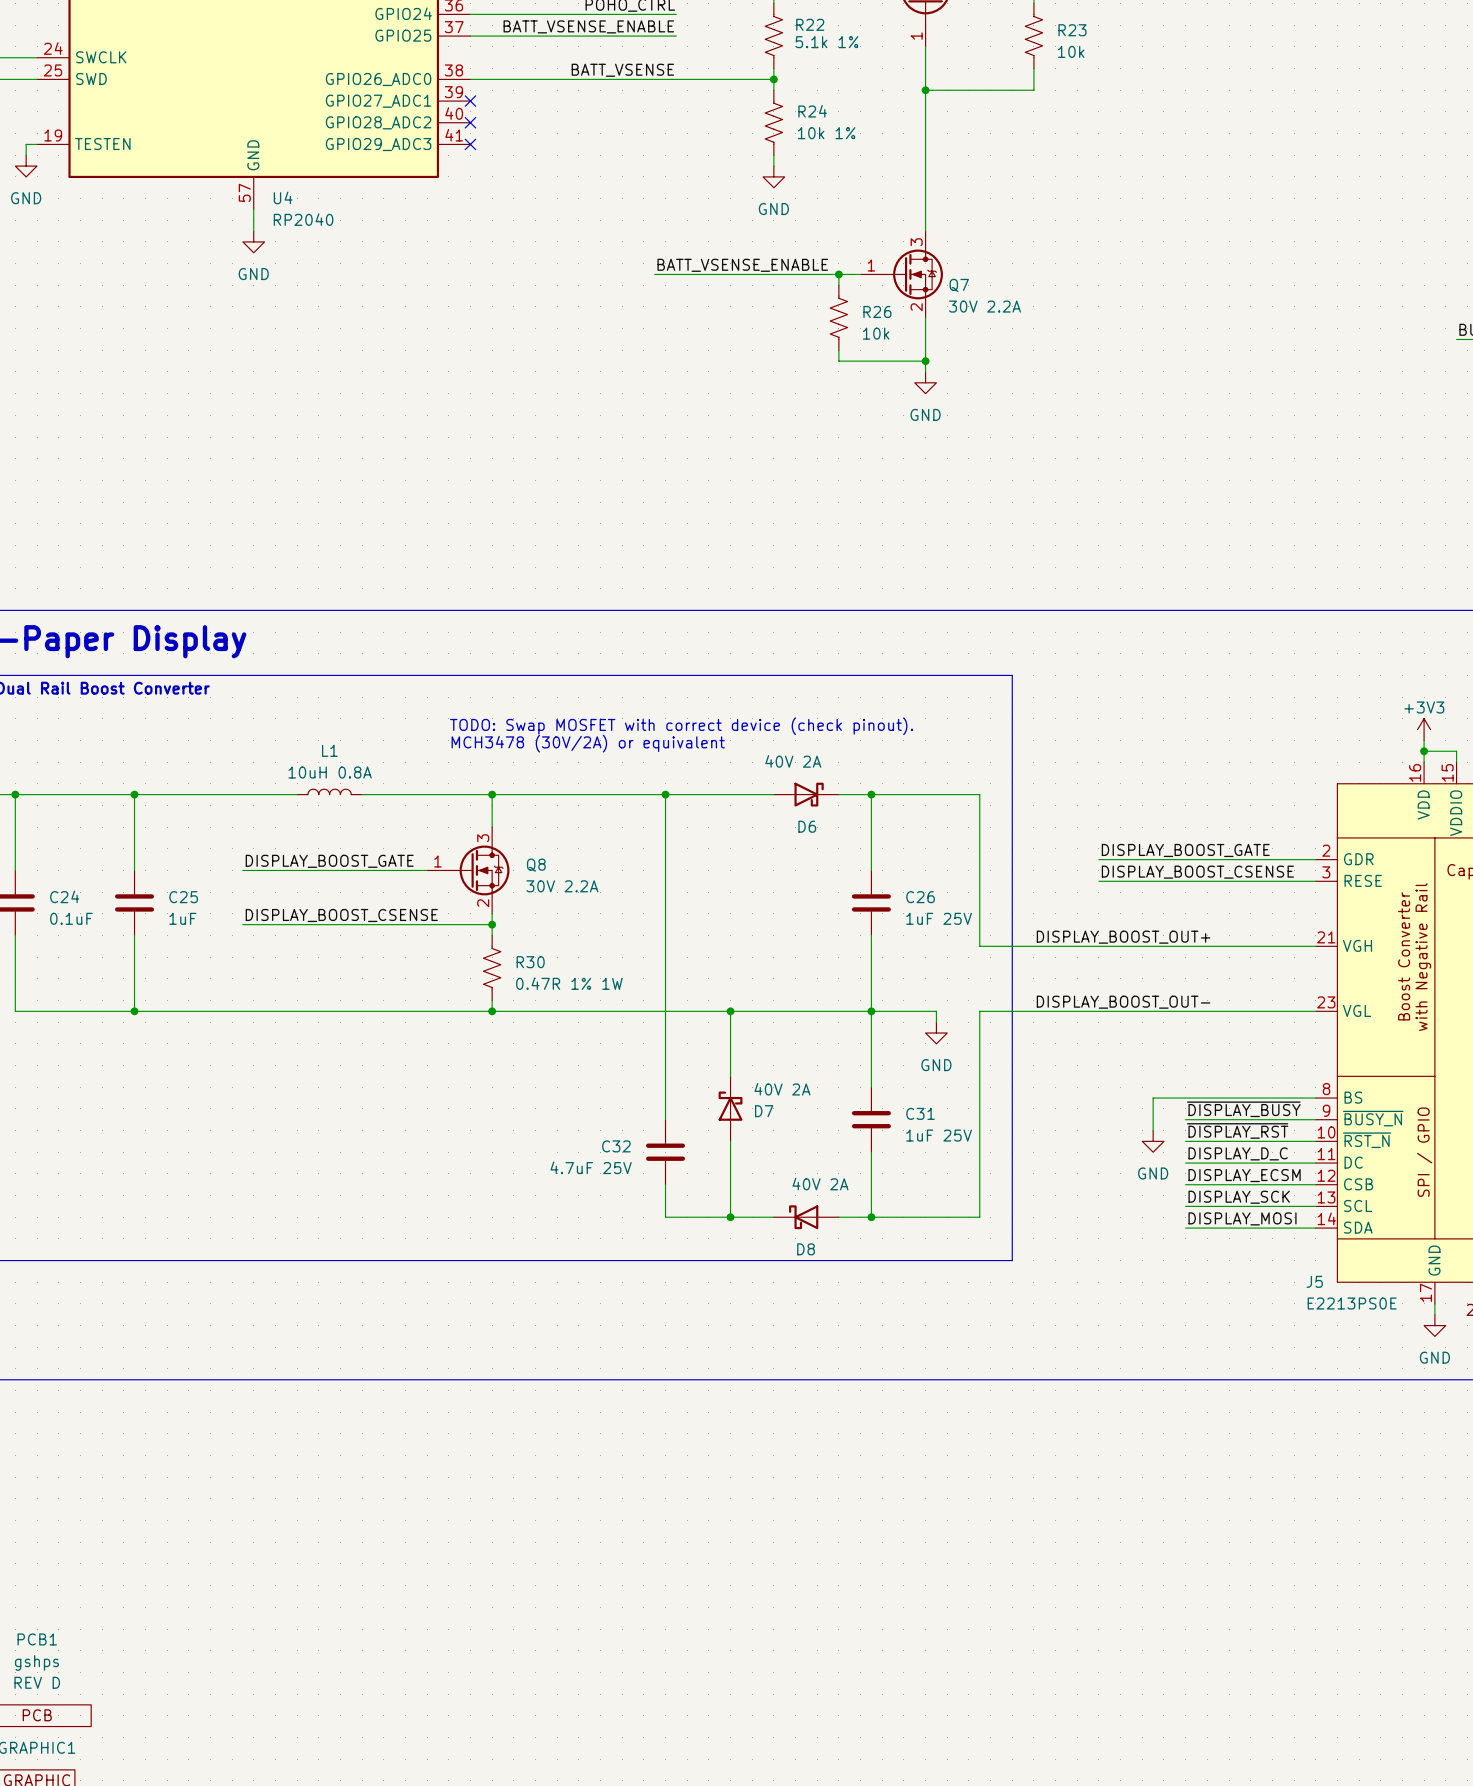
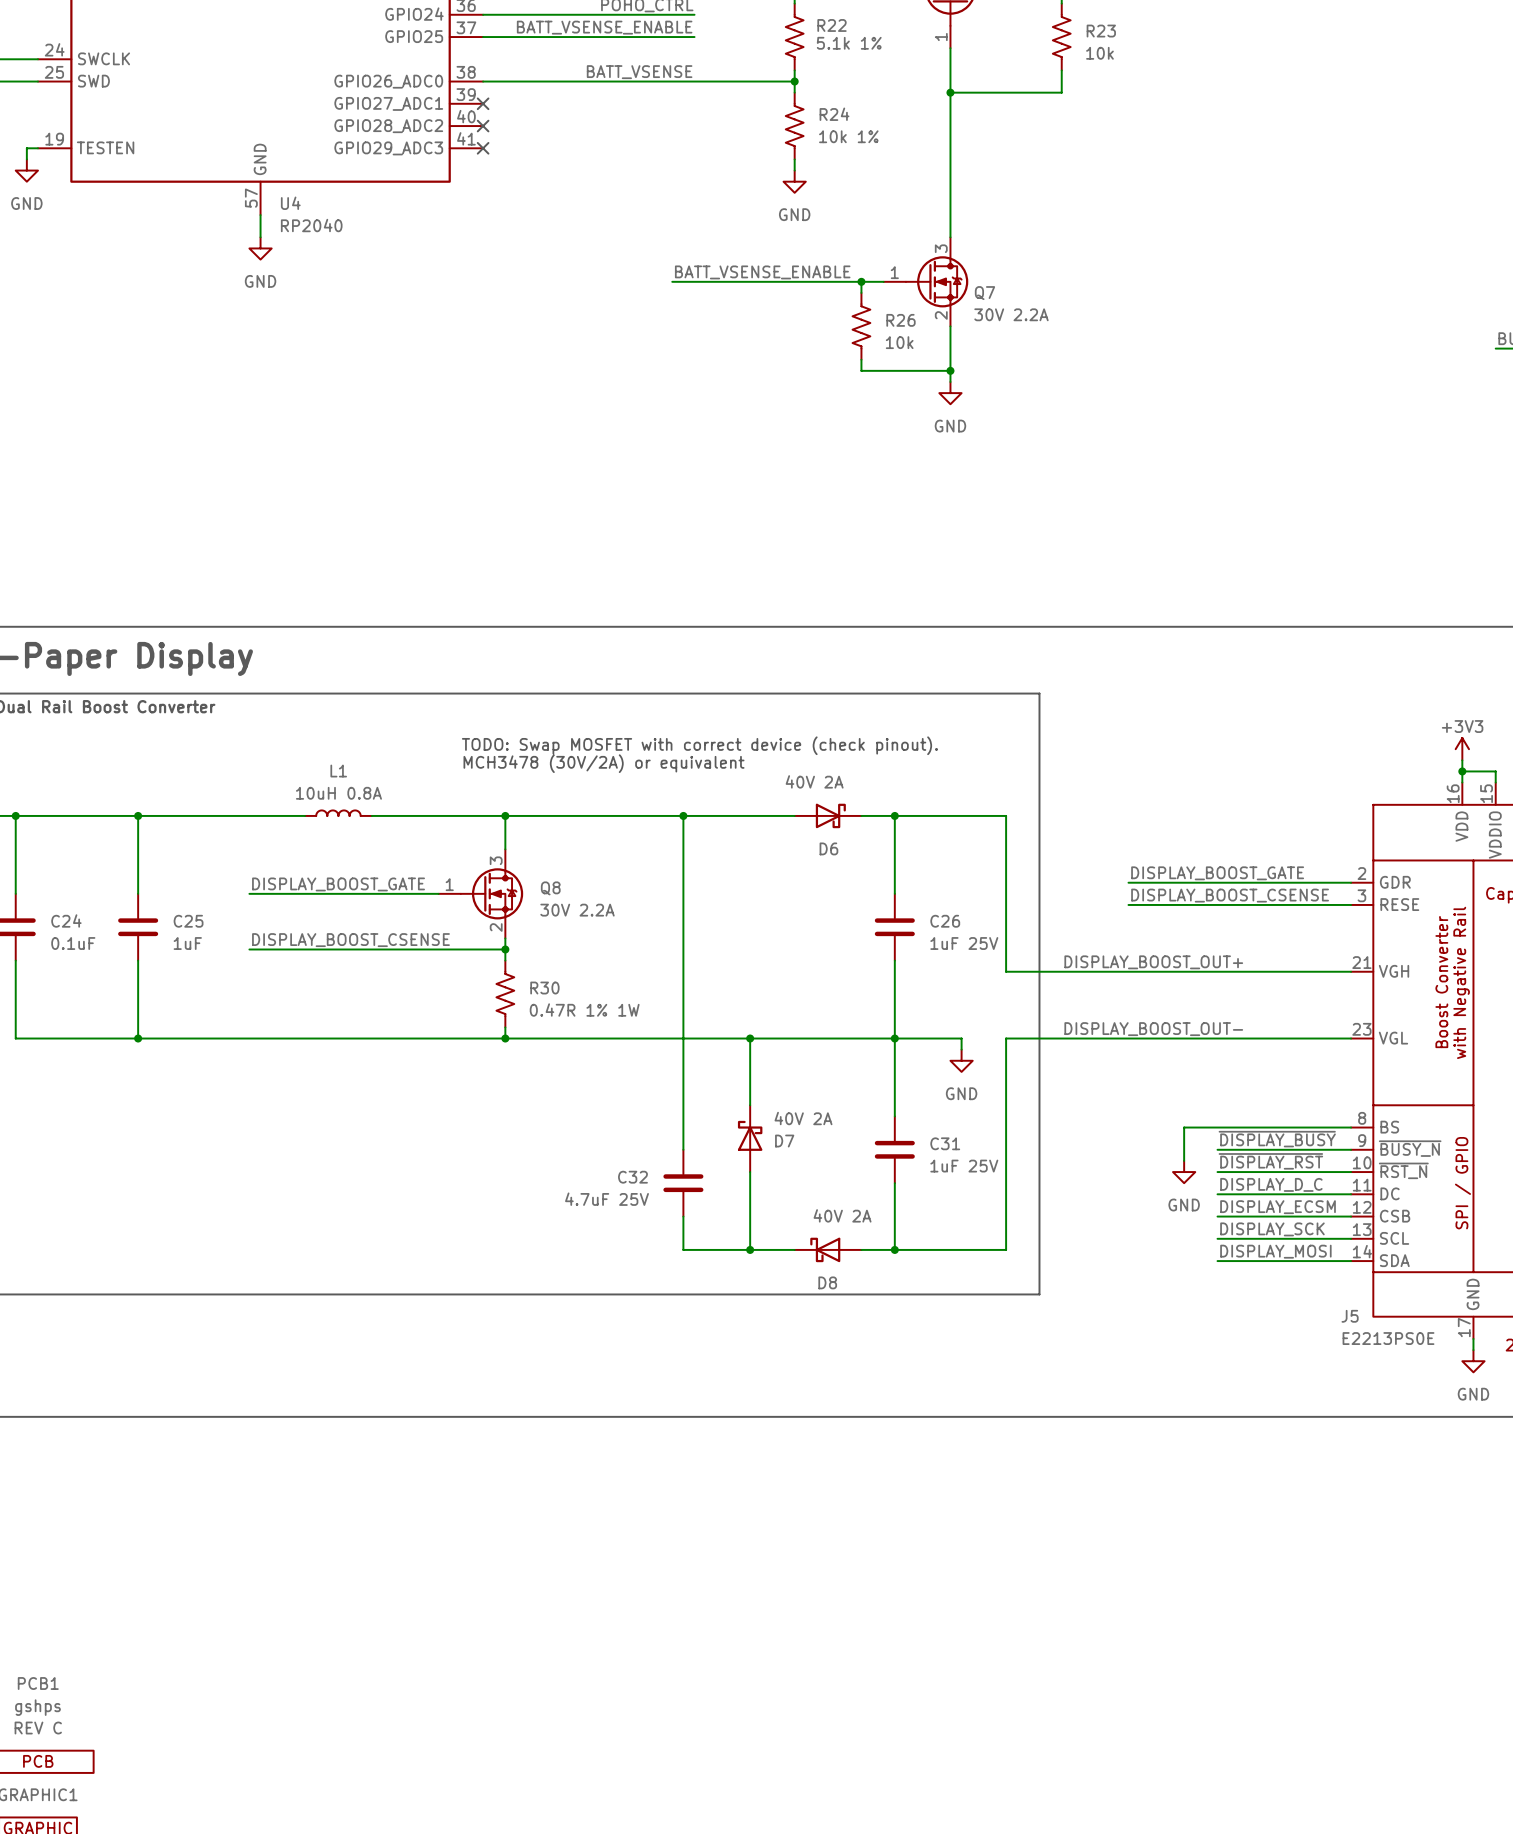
PCB1 text: REV D (37, 1682) -> REV C (38, 1728)

